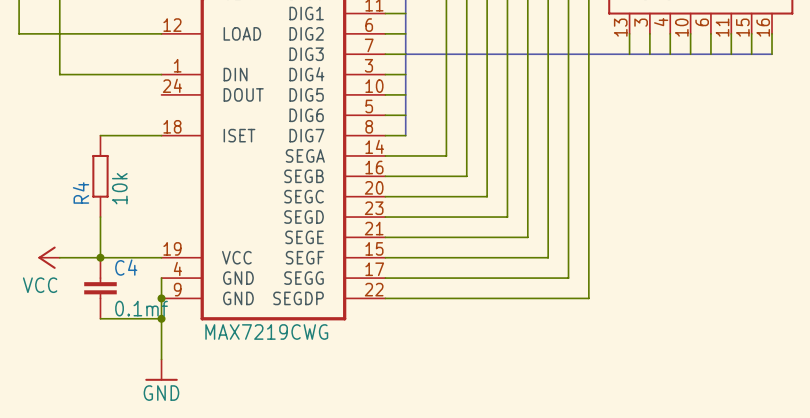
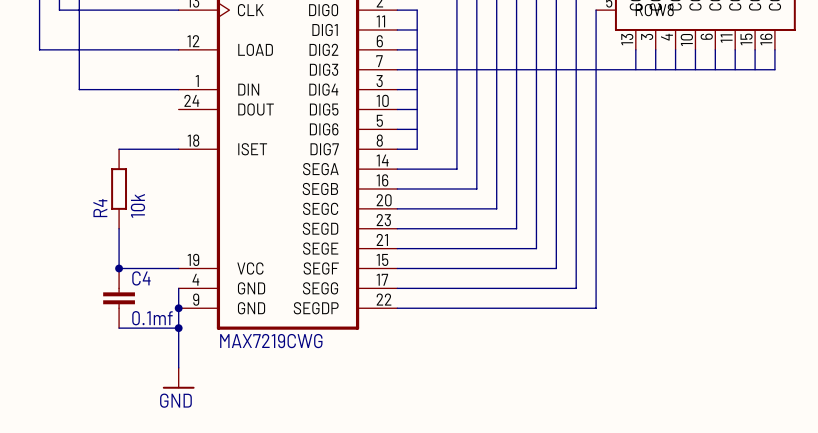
power symbol: VCC (49, 257) -> none
wire: (59, 257) (100, 257) -> none

